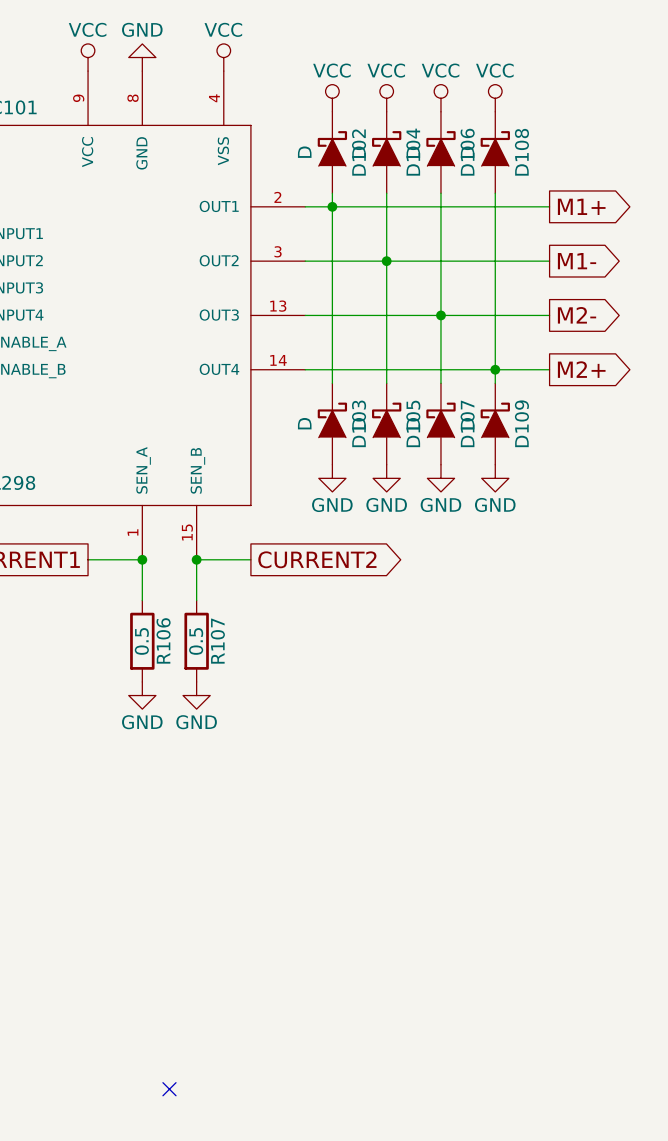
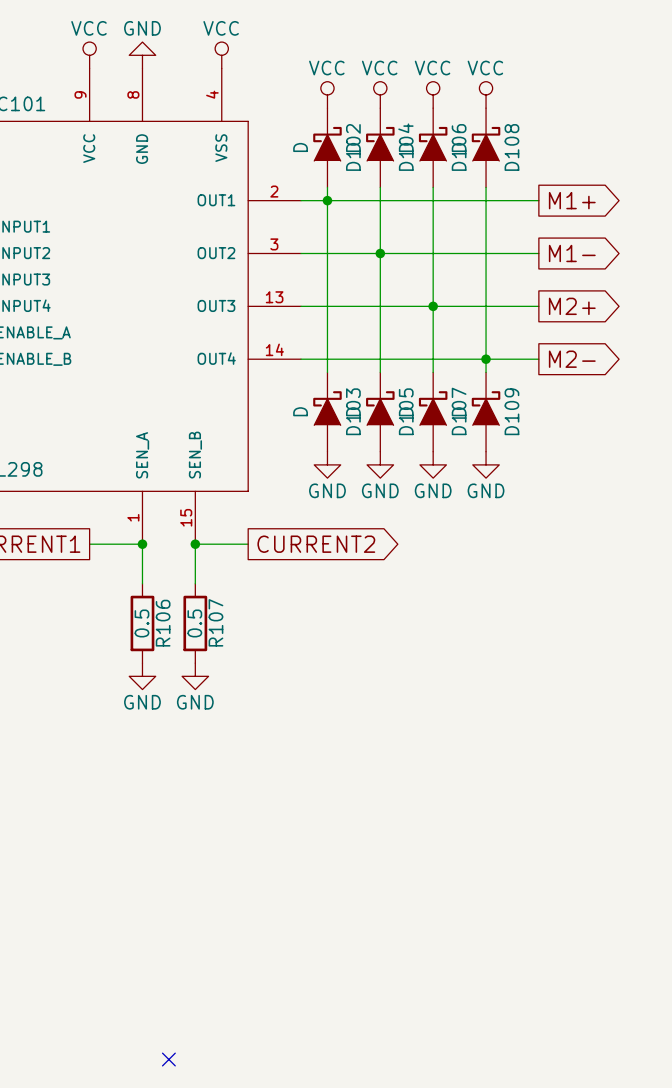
global label: M2- (577, 315) -> M2+ (572, 306)
global label: M2+ (581, 369) -> M2- (572, 359)

